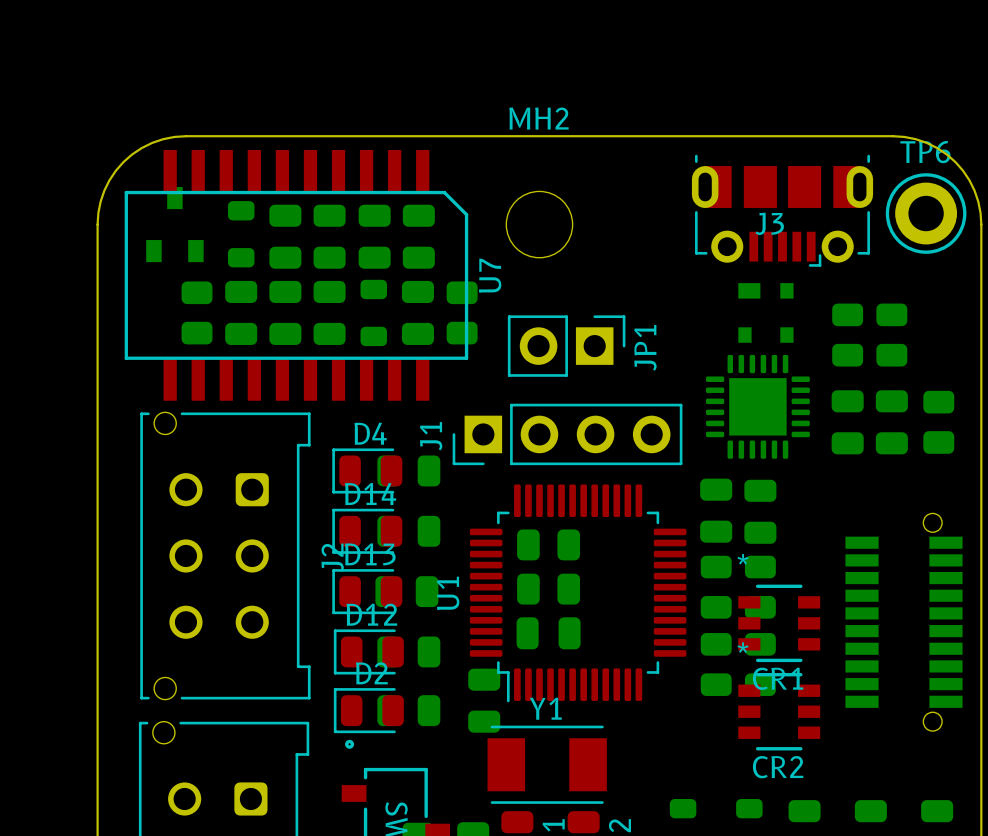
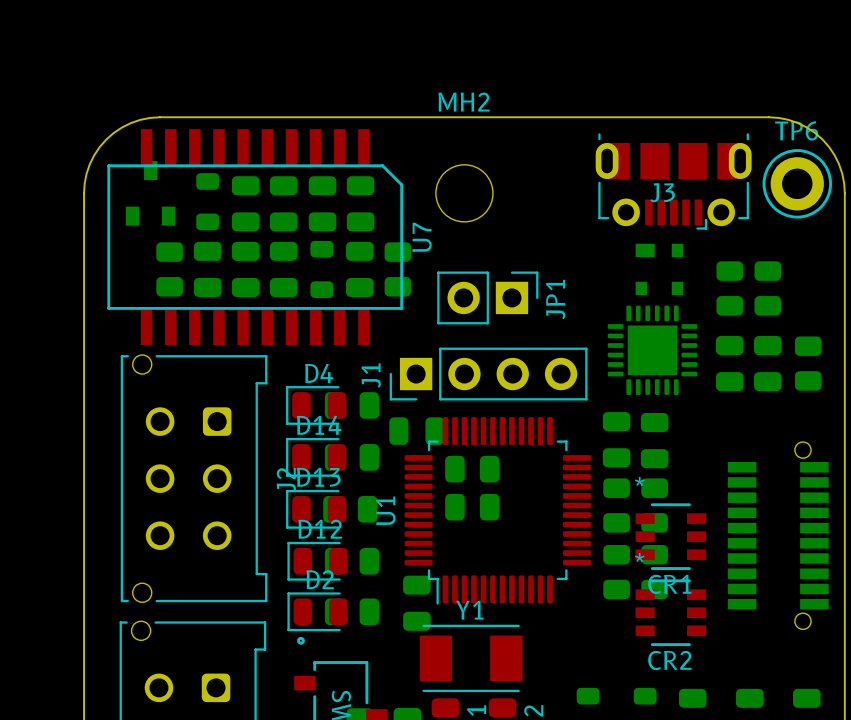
part position: (548, 633) -> (416, 431)

